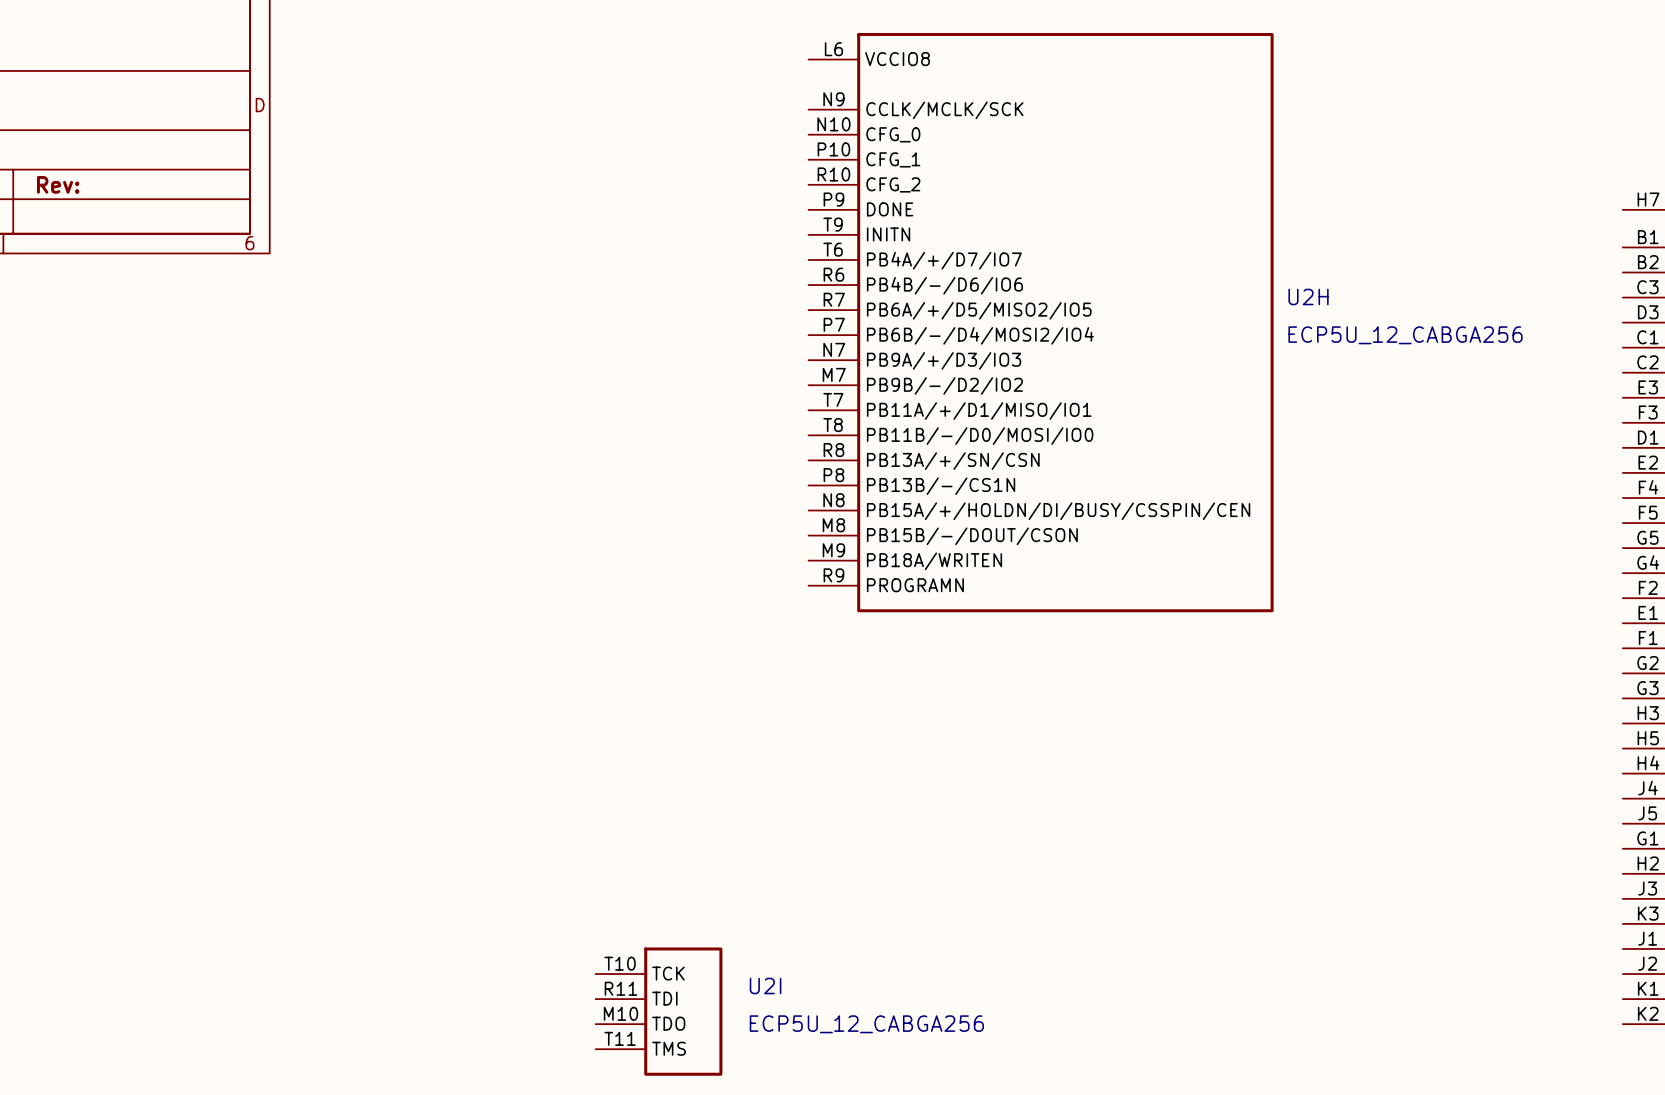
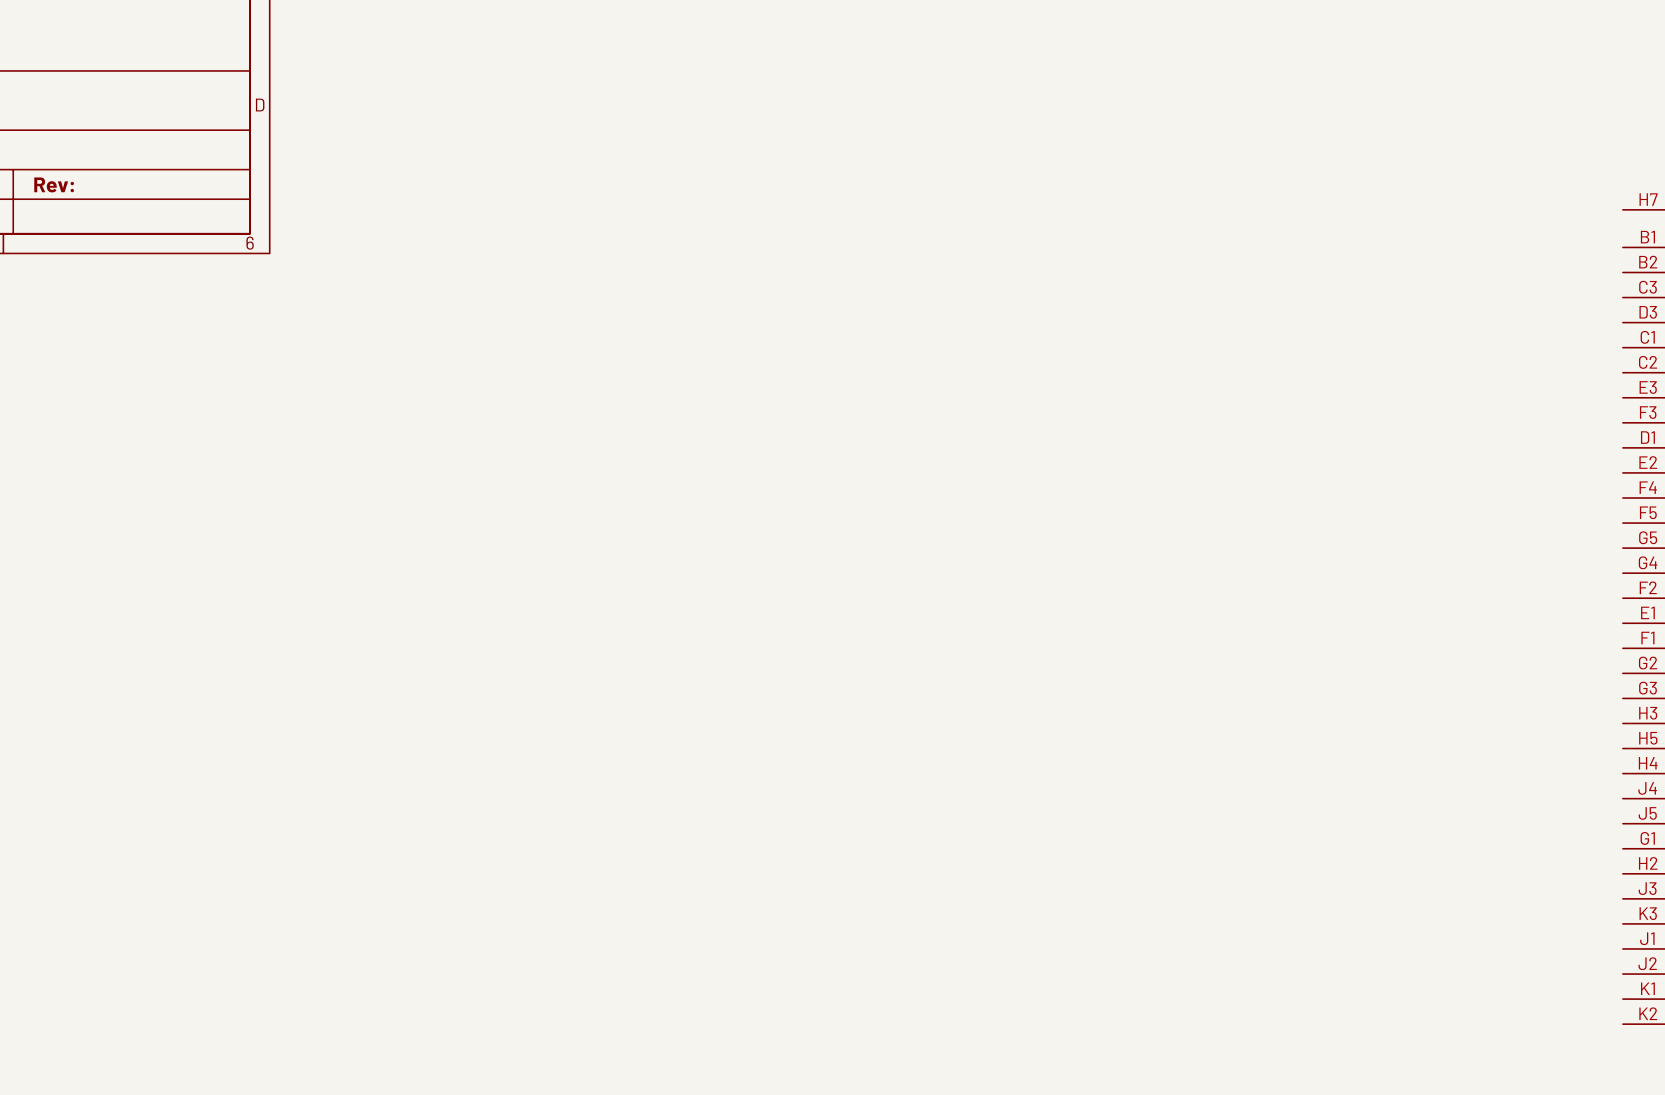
U2H: ECP5U_12_CABGA256 (1041, 322) -> none
U2I: ECP5U_12_CABGA256 (659, 1011) -> none

